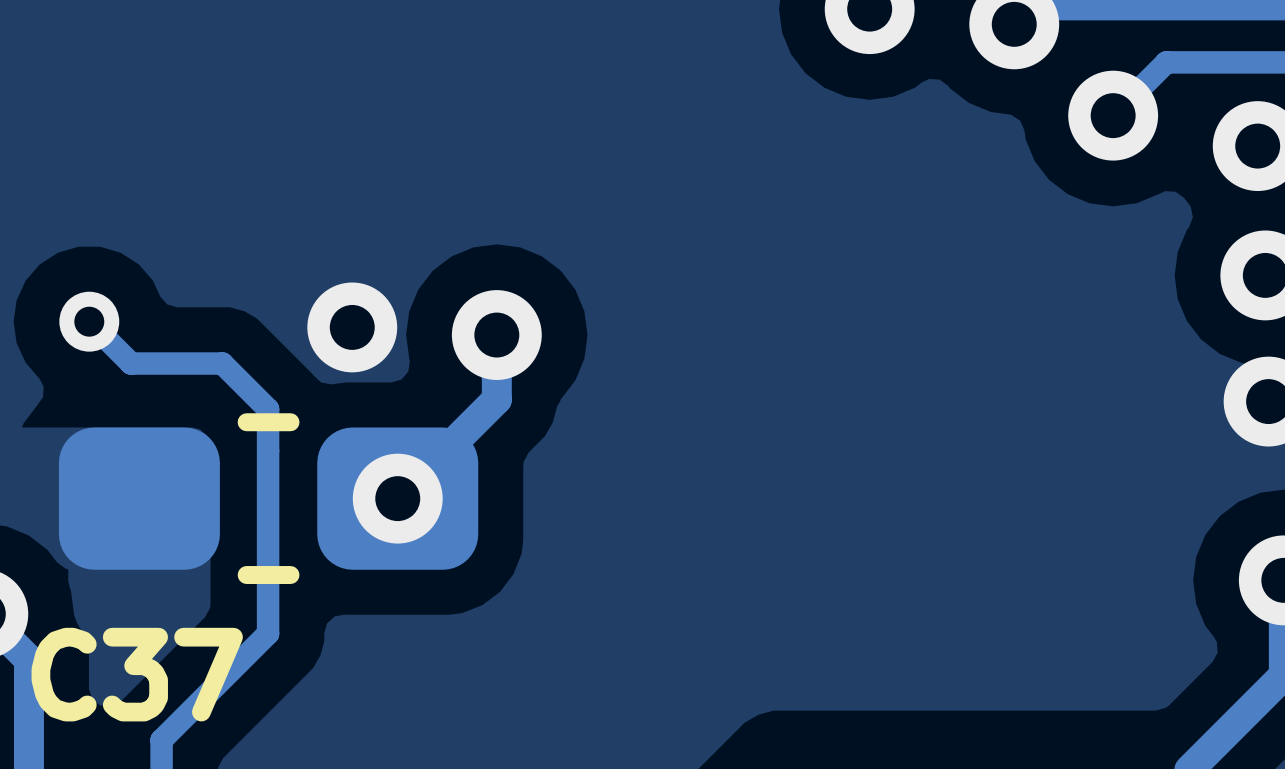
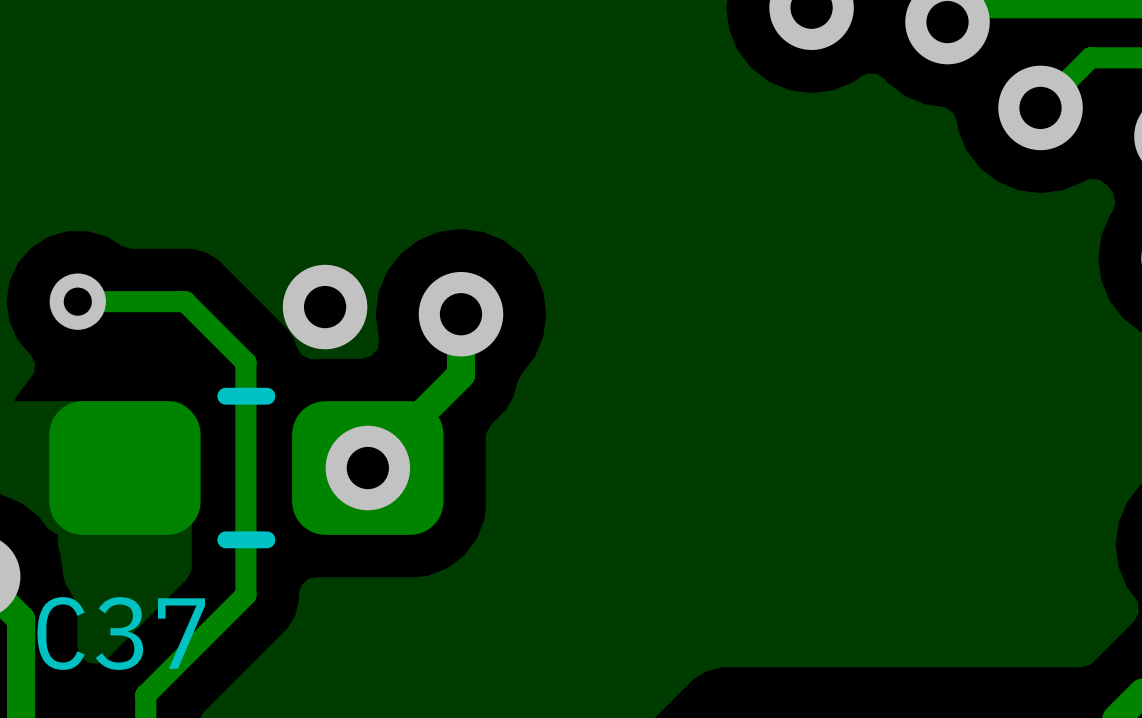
track: (89, 321) (131, 363) (222, 363) (268, 409) -> (77, 301) (185, 301) (245, 362) (245, 383)

